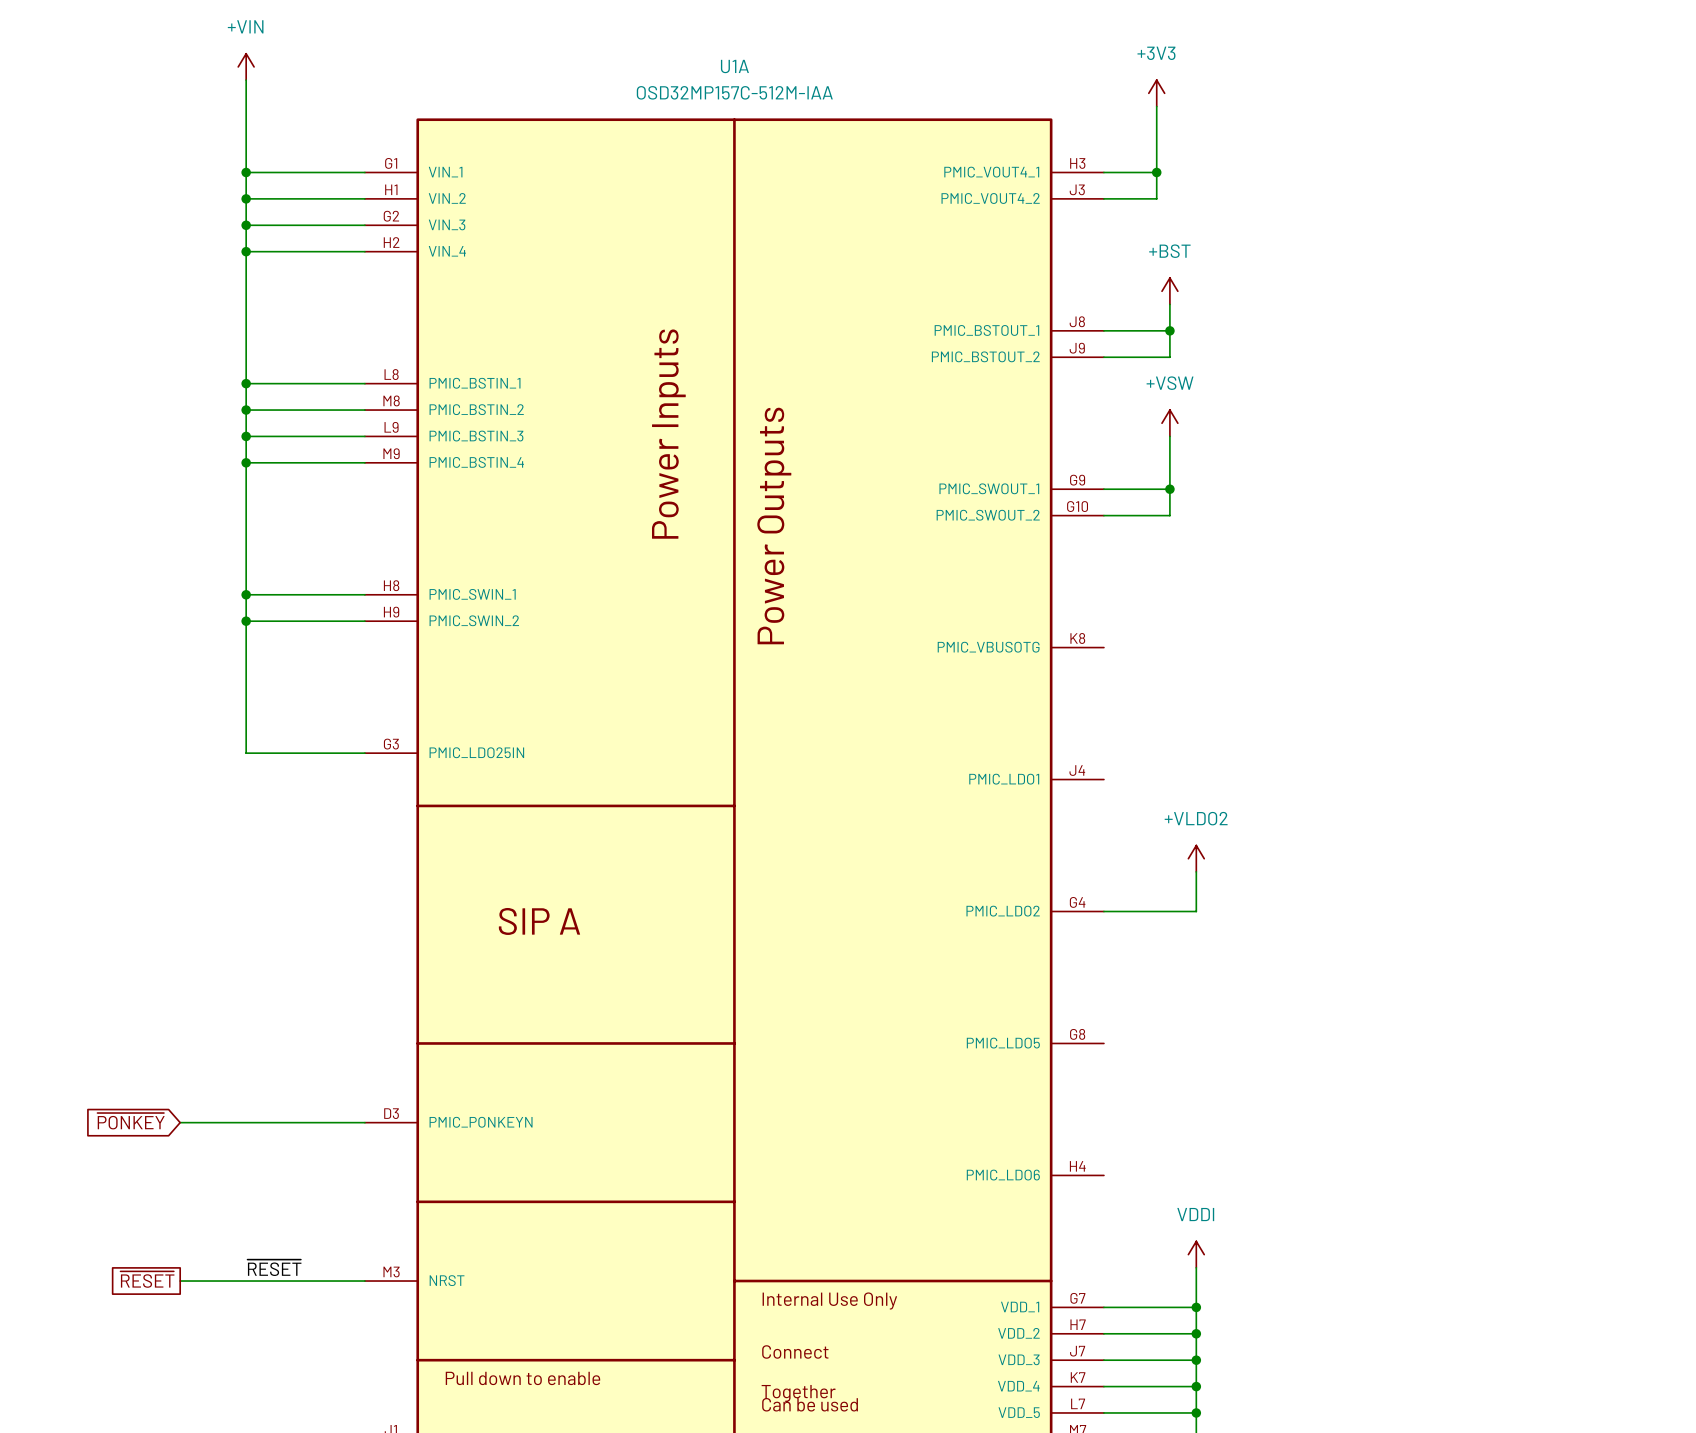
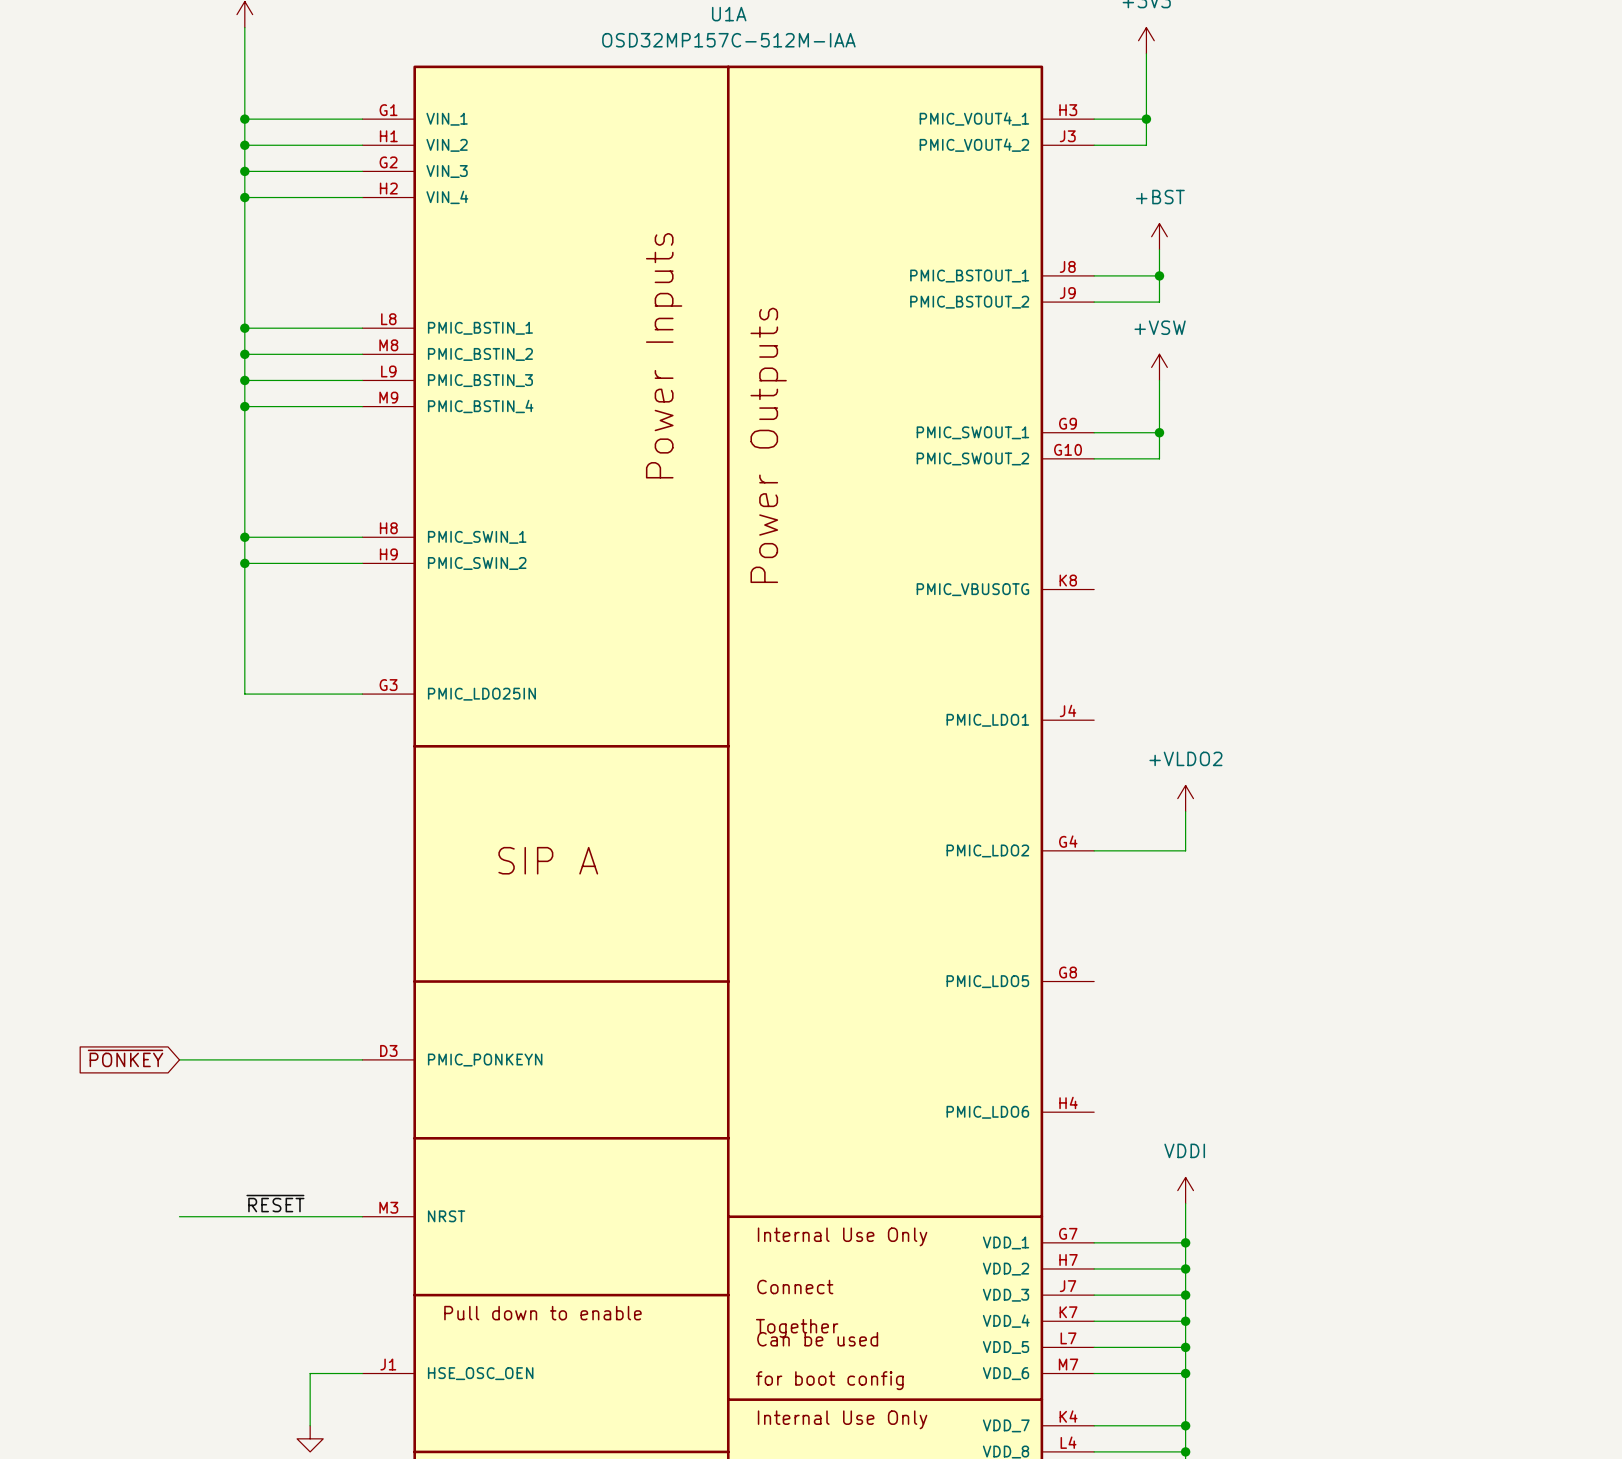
global label: ~{RESET} (147, 1279) -> none

